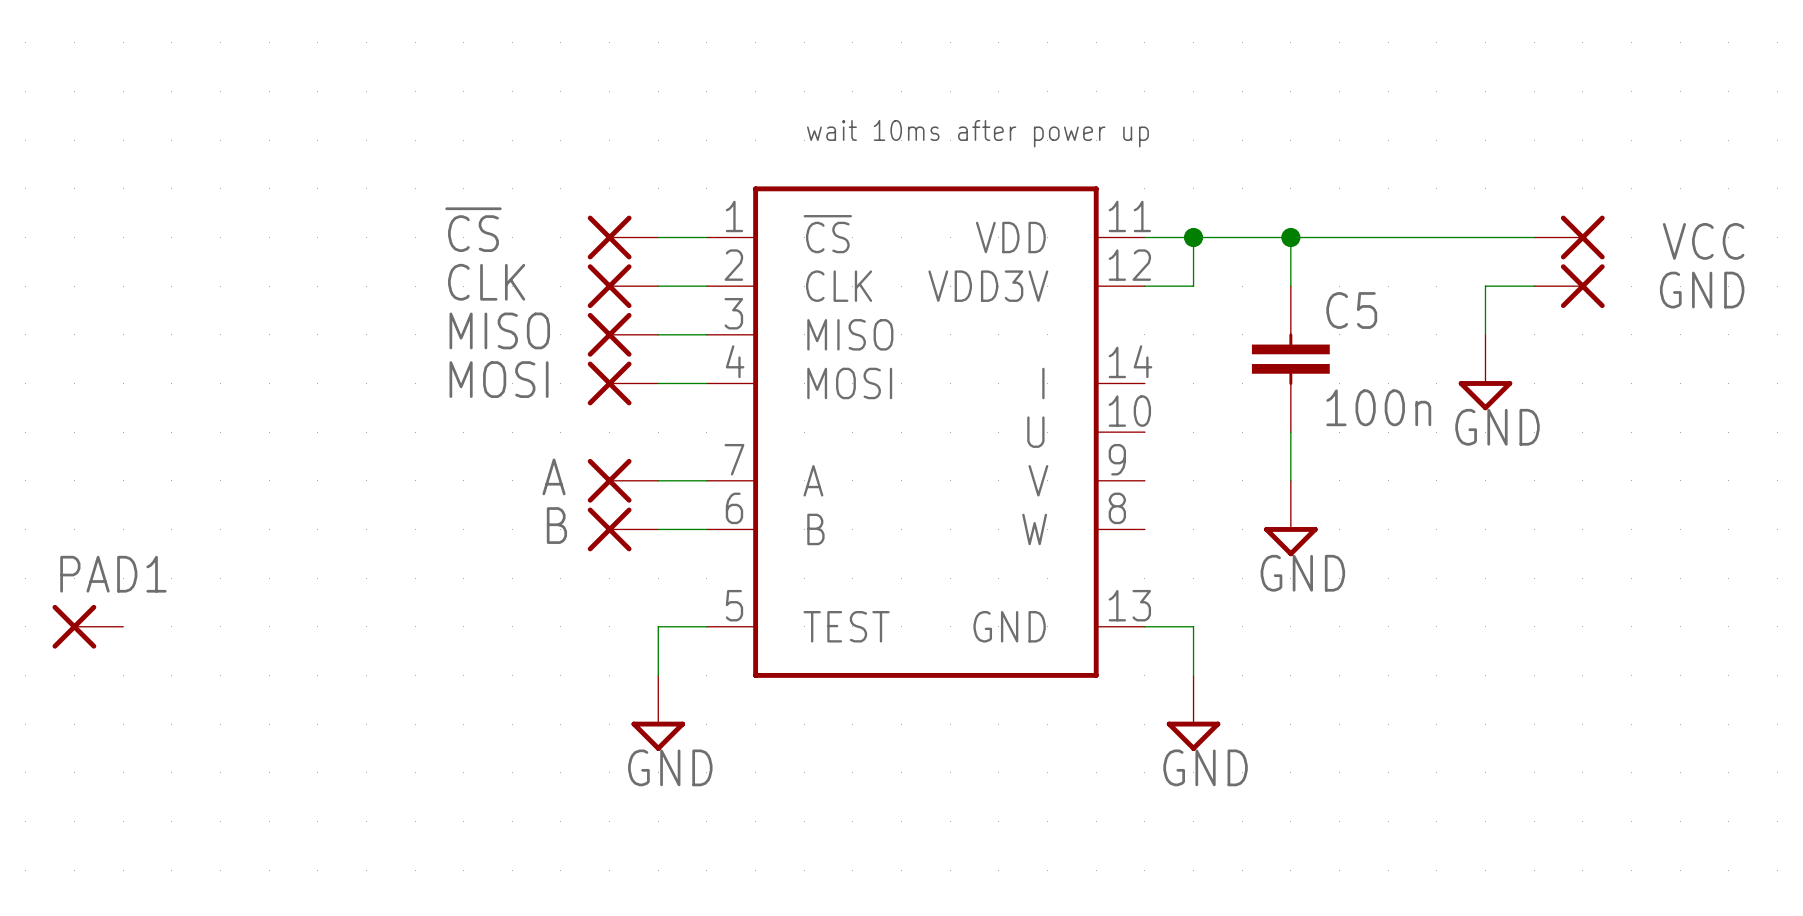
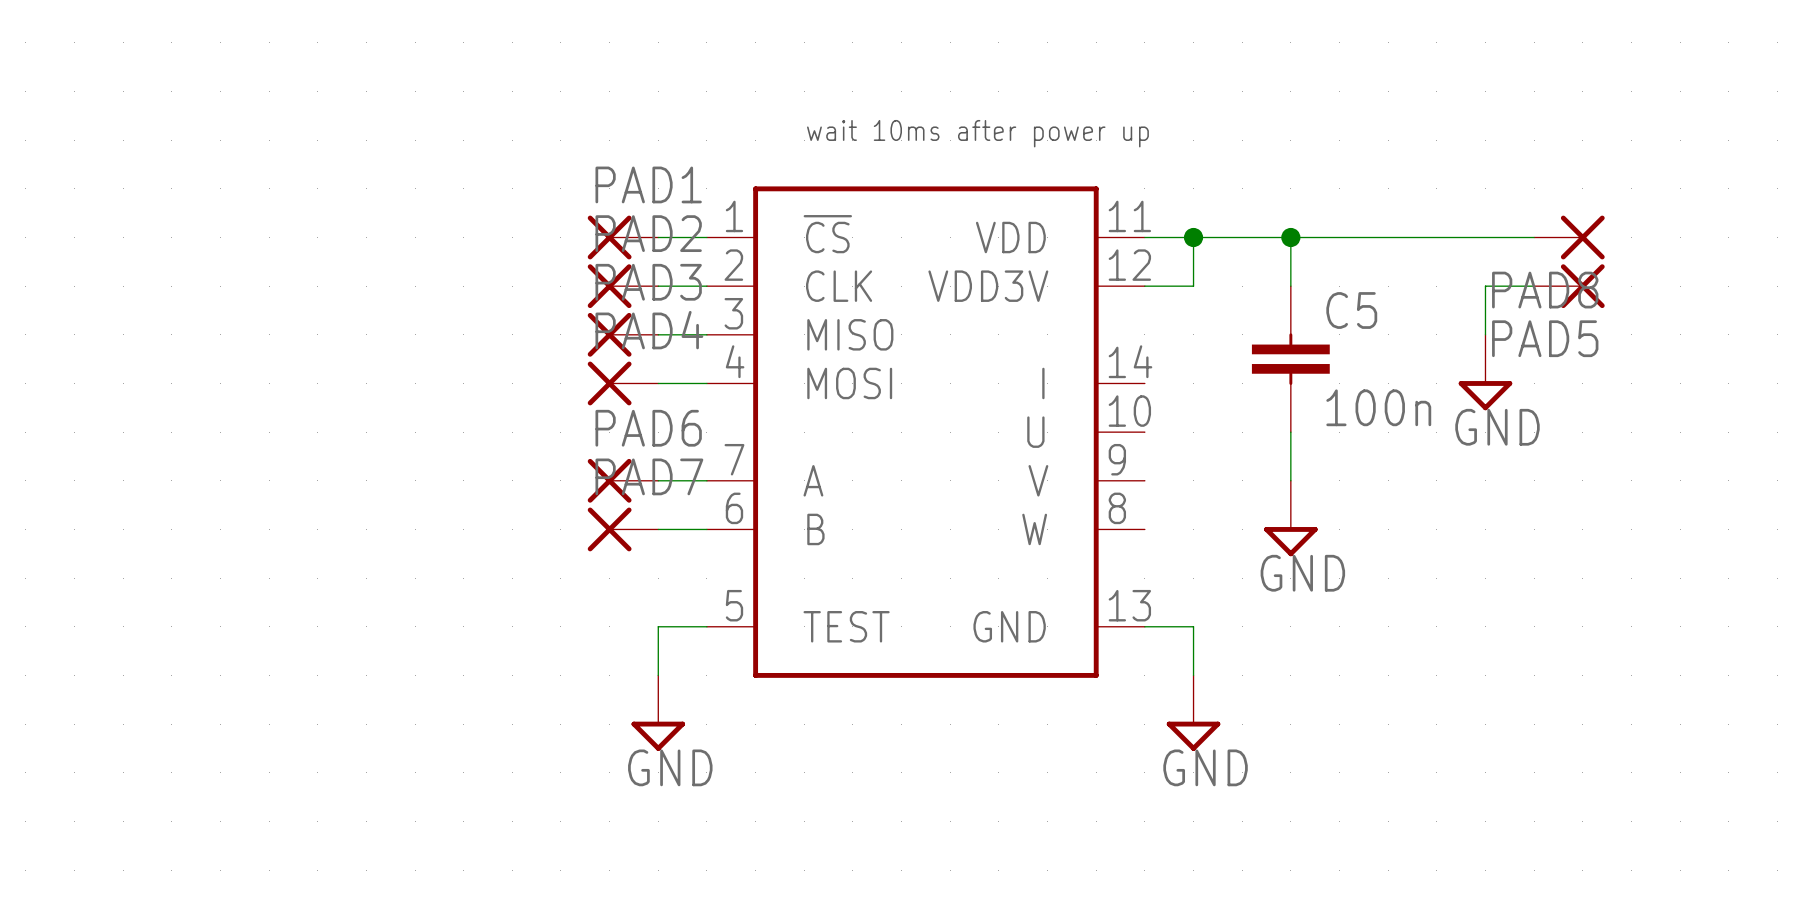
~{CS} name: ~{CS} (473, 229) -> PAD1 (648, 184)
VCC name: VCC (1703, 241) -> PAD8 (1545, 290)
CLK name: CLK (486, 282) -> PAD2 (648, 233)
GND name: GND (1702, 290) -> PAD5 (1545, 338)
MISO name: MISO (499, 330) -> PAD3 (648, 282)
MOSI name: MOSI (499, 379) -> PAD4 (649, 330)
A name: A (554, 476) -> PAD6 (648, 428)
B name: B (556, 525) -> PAD7 (649, 476)
PAD1: (87, 626) -> none

